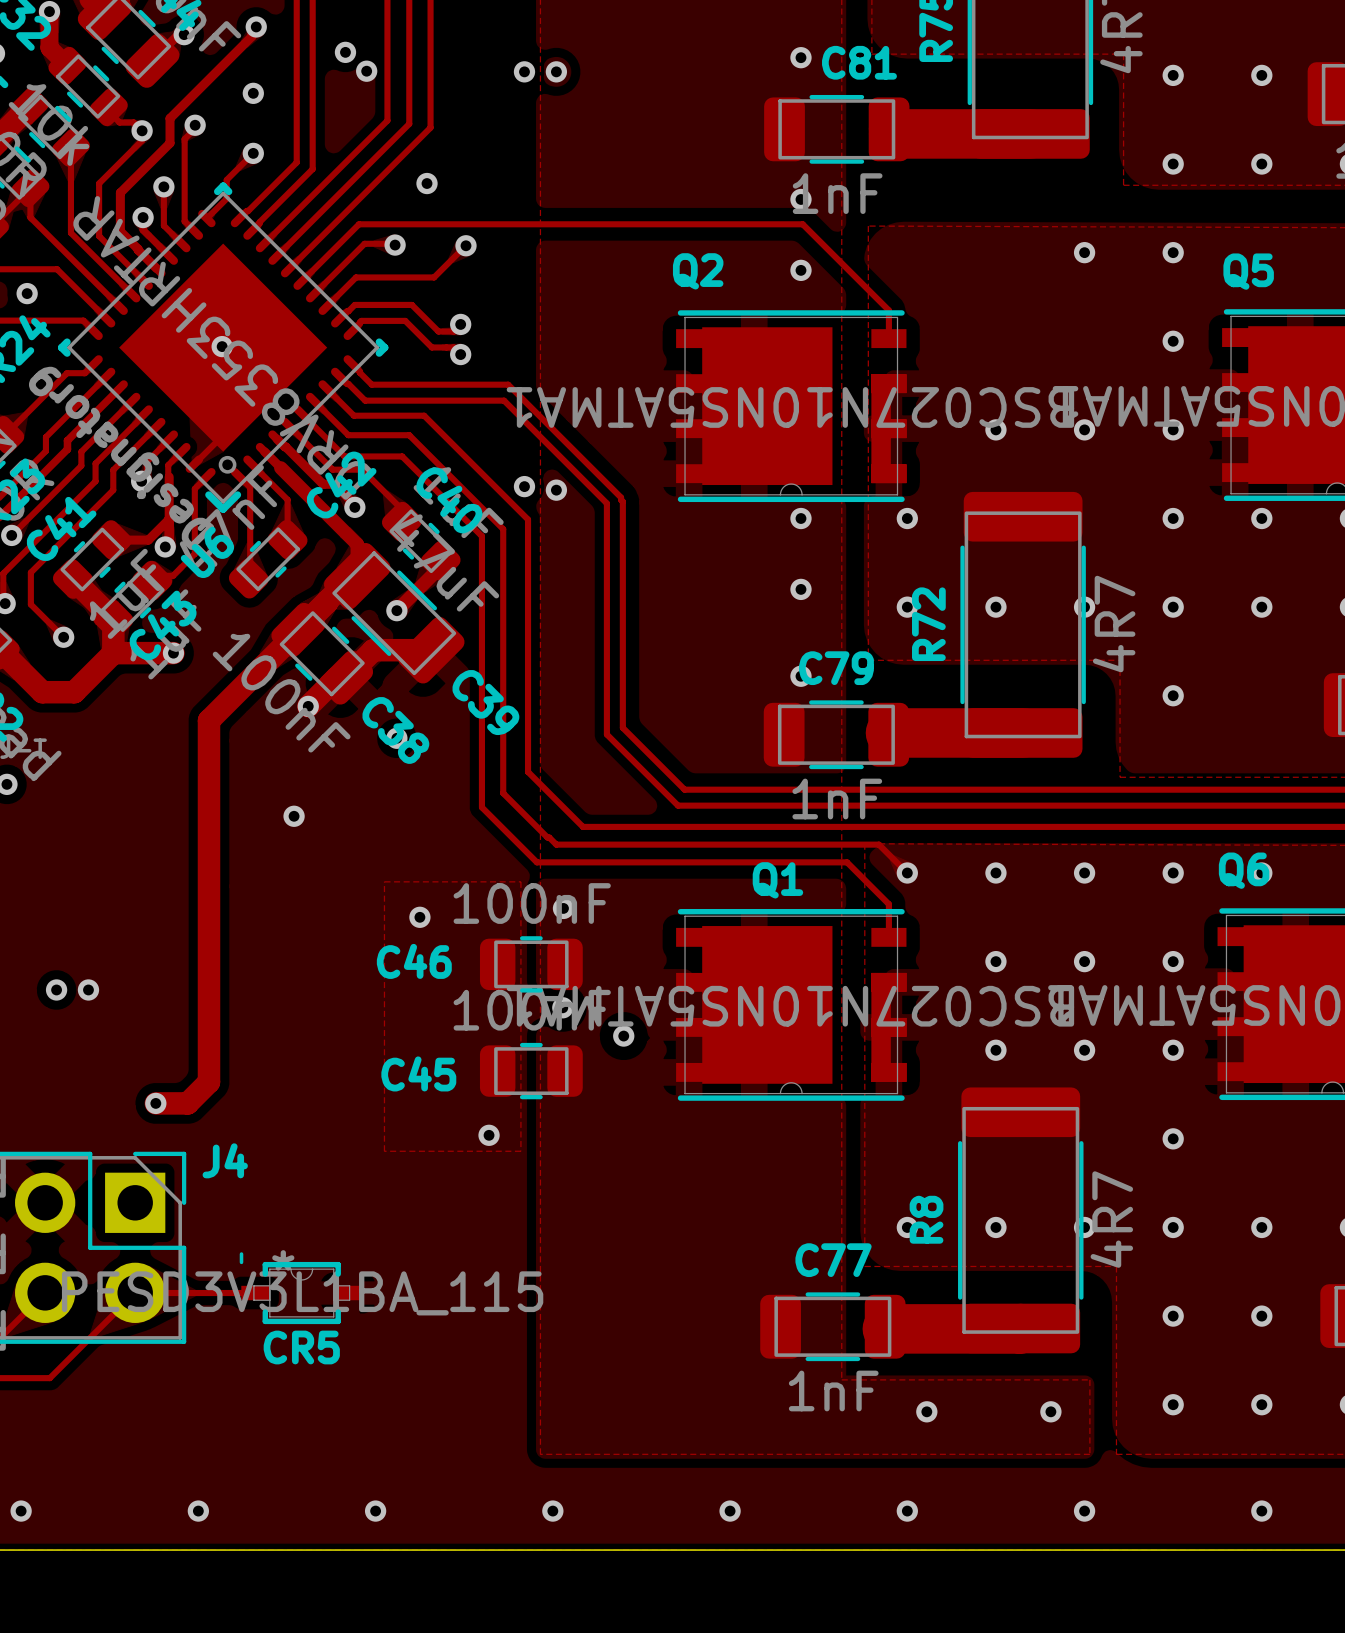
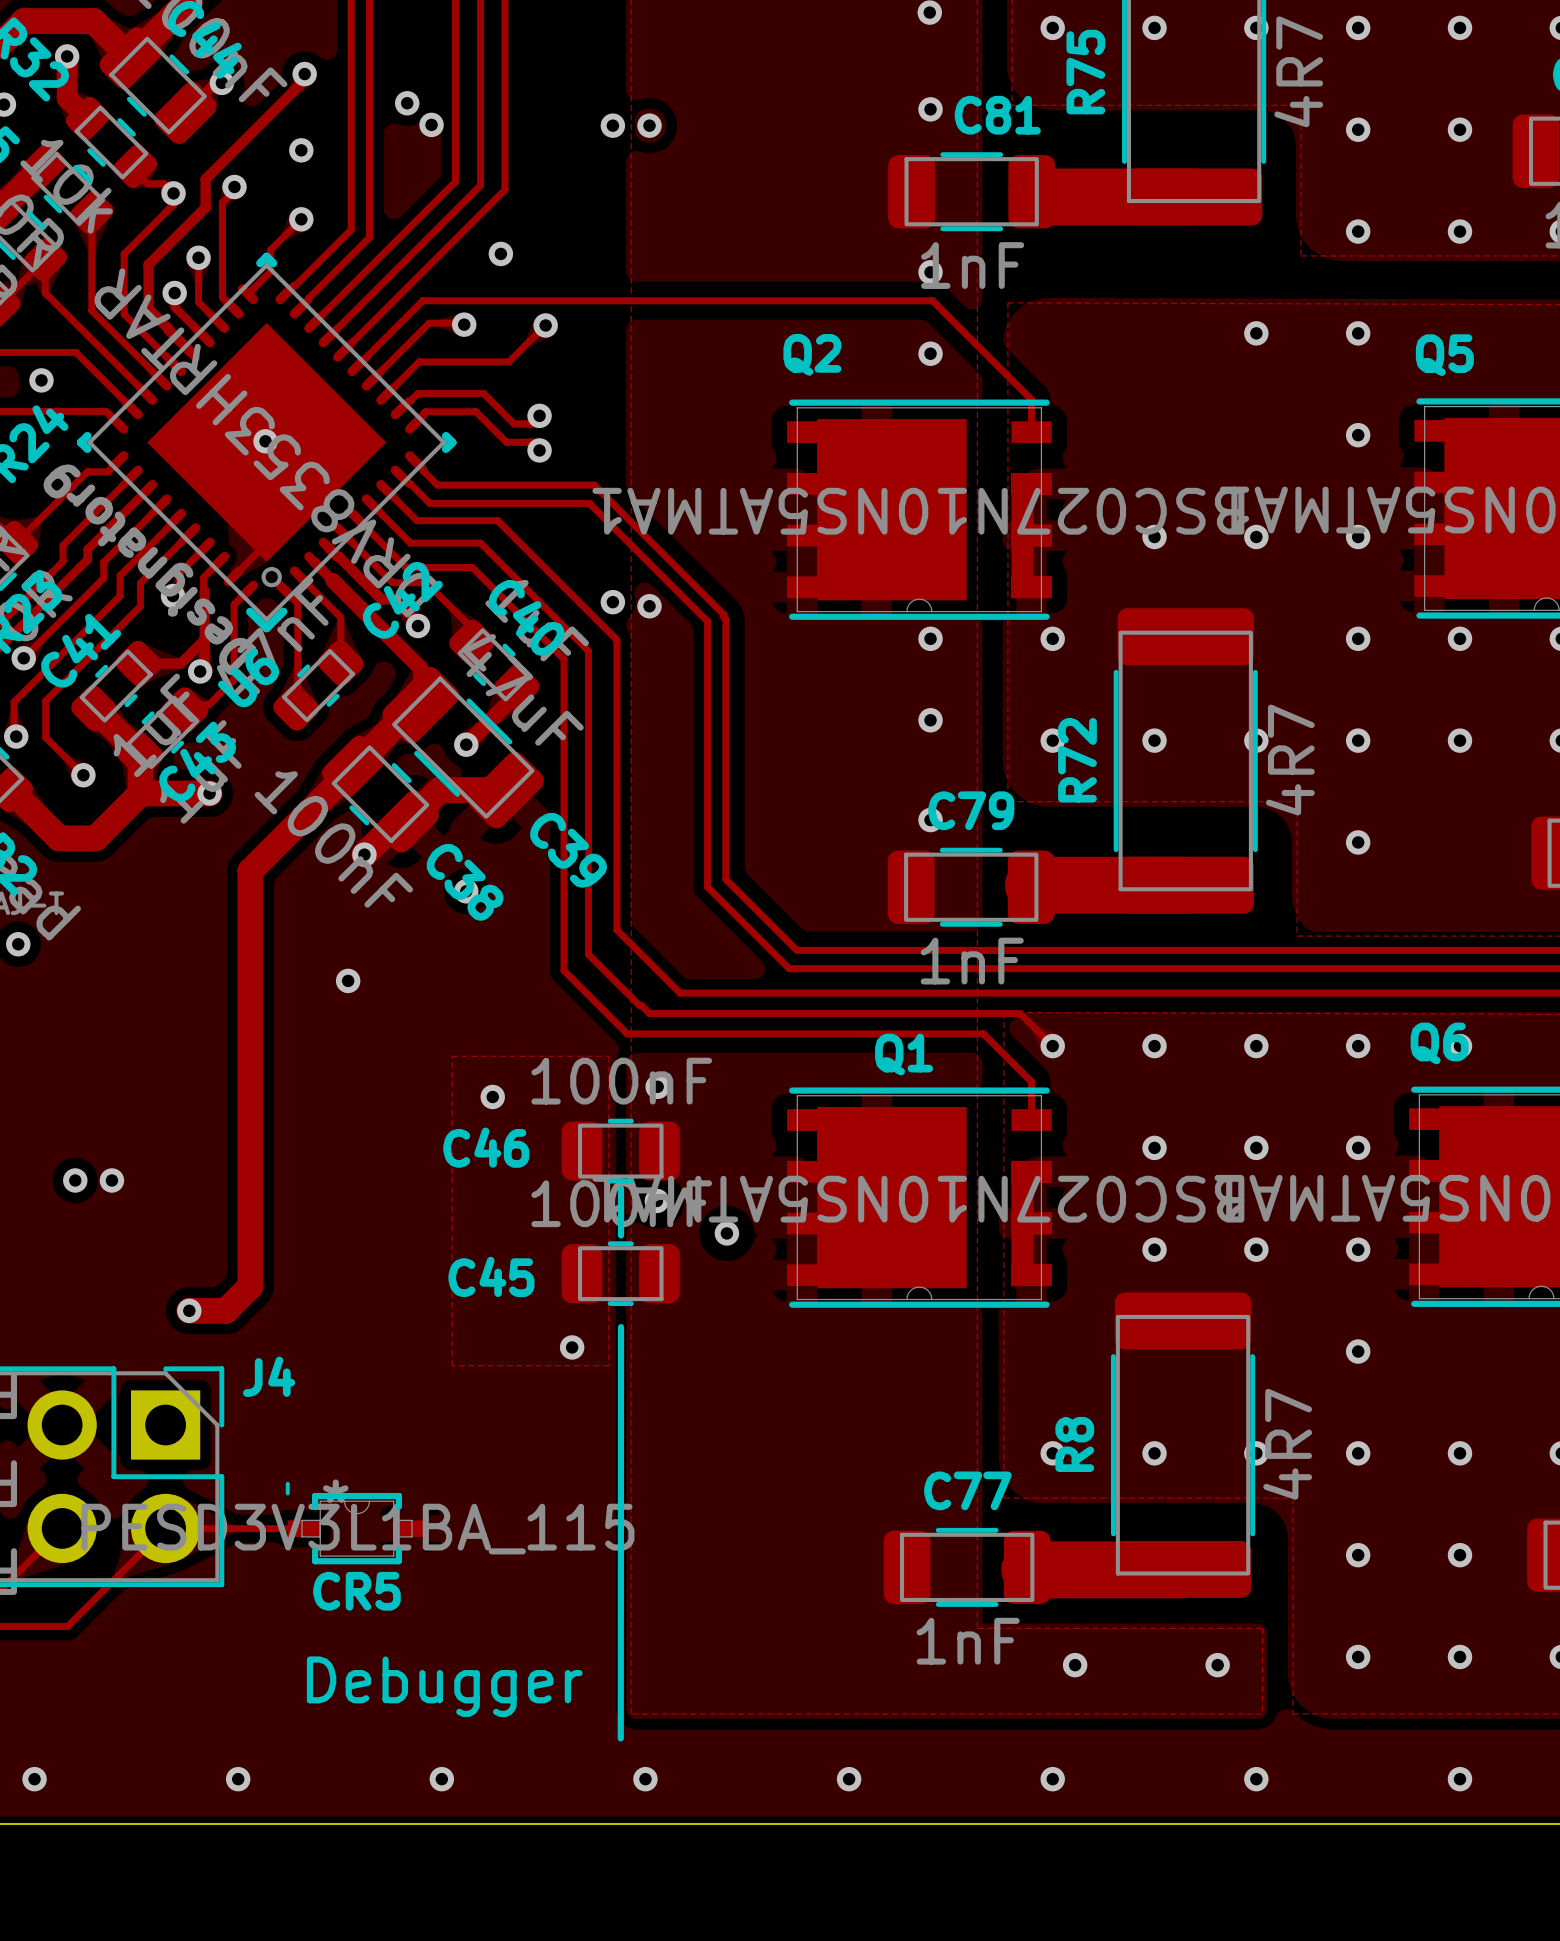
line: none -> (621, 1188) (621, 1235)
line: none -> (621, 1327) (620, 1738)
text: none -> Debugger (444, 1686)

